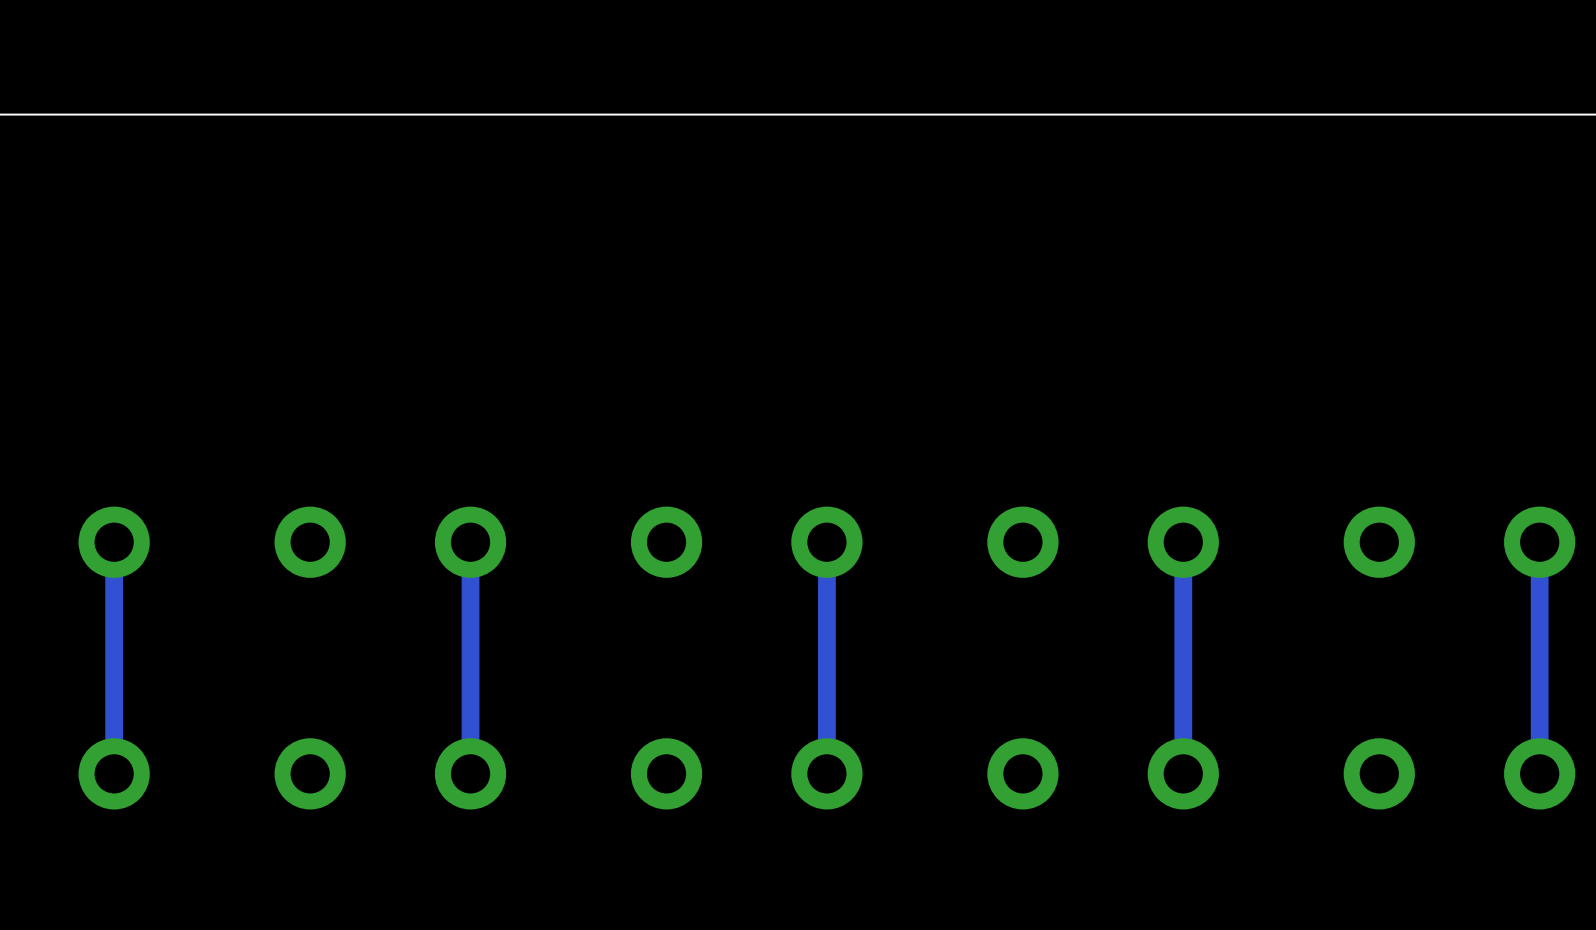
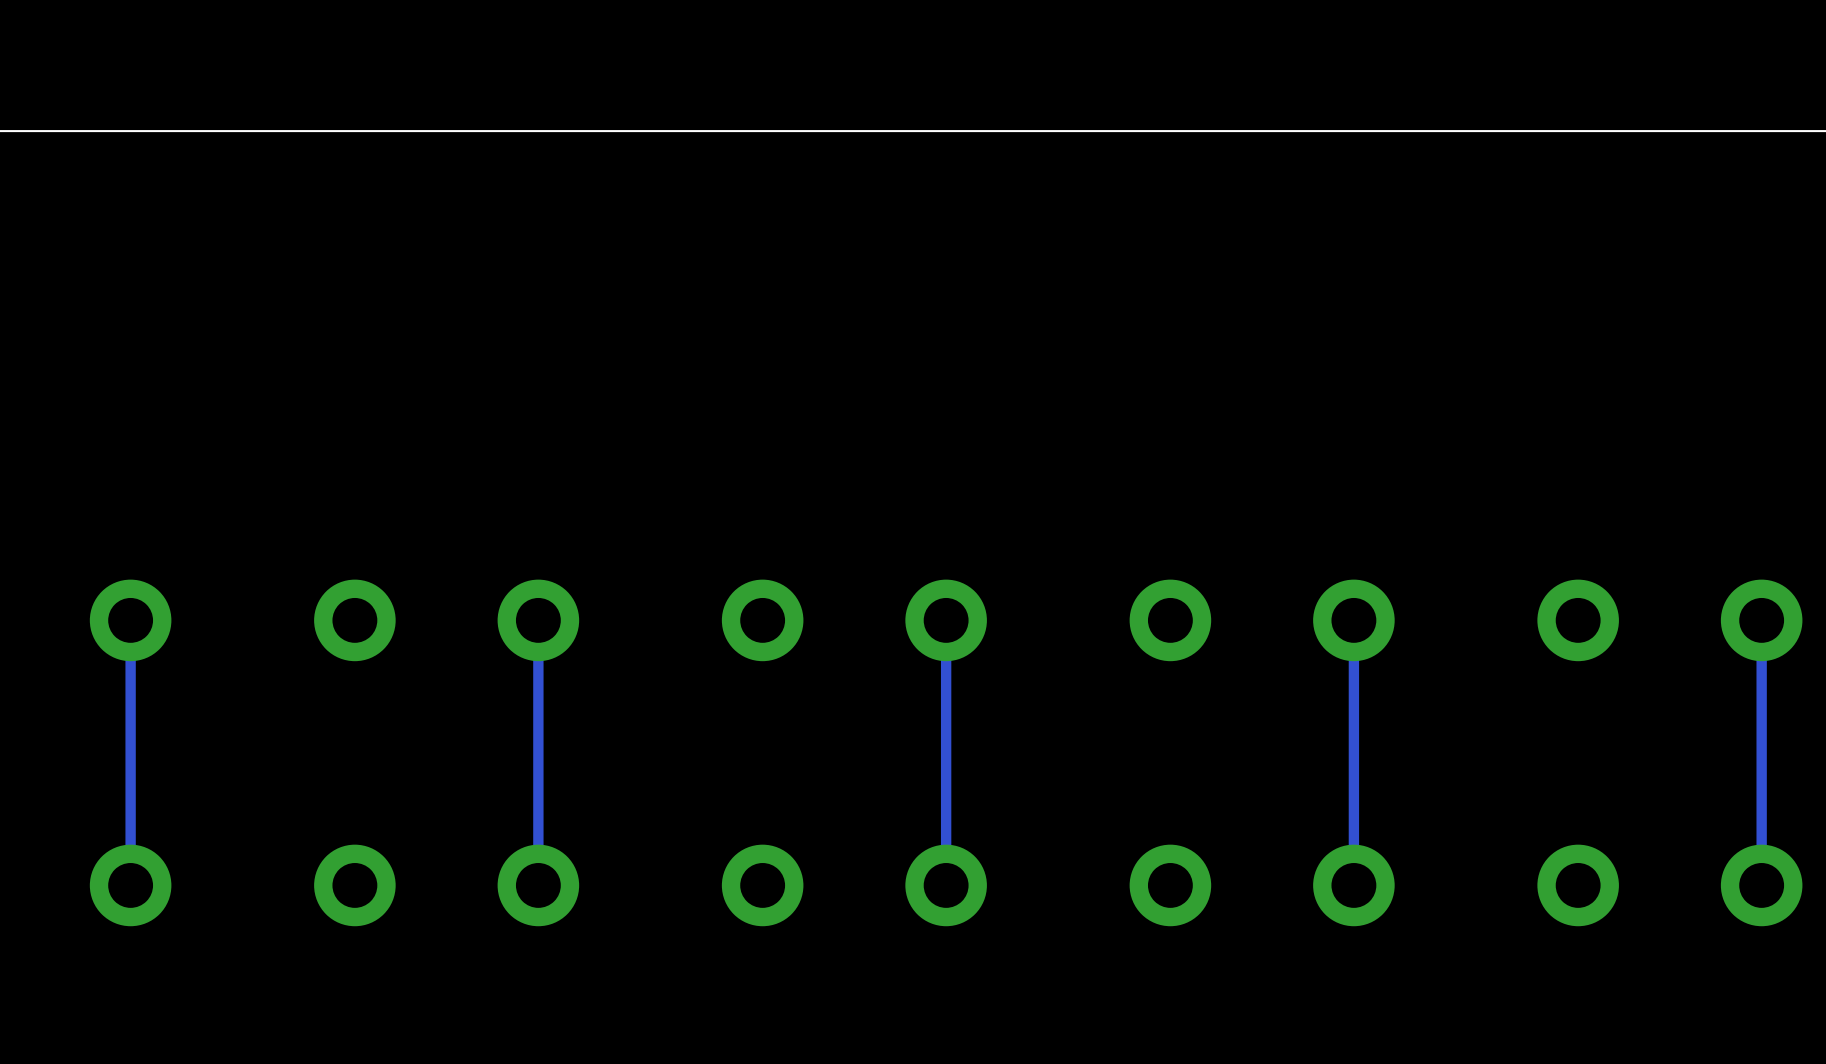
track width: thick (114, 542) (114, 773) -> thin (130, 620) (130, 885)
track width: thick (470, 542) (470, 773) -> thin (538, 620) (538, 885)
track width: thick (826, 542) (826, 773) -> thin (946, 620) (946, 885)
track width: thick (1183, 542) (1183, 773) -> thin (1353, 620) (1353, 885)
track width: thick (1539, 542) (1539, 773) -> thin (1761, 620) (1761, 885)

